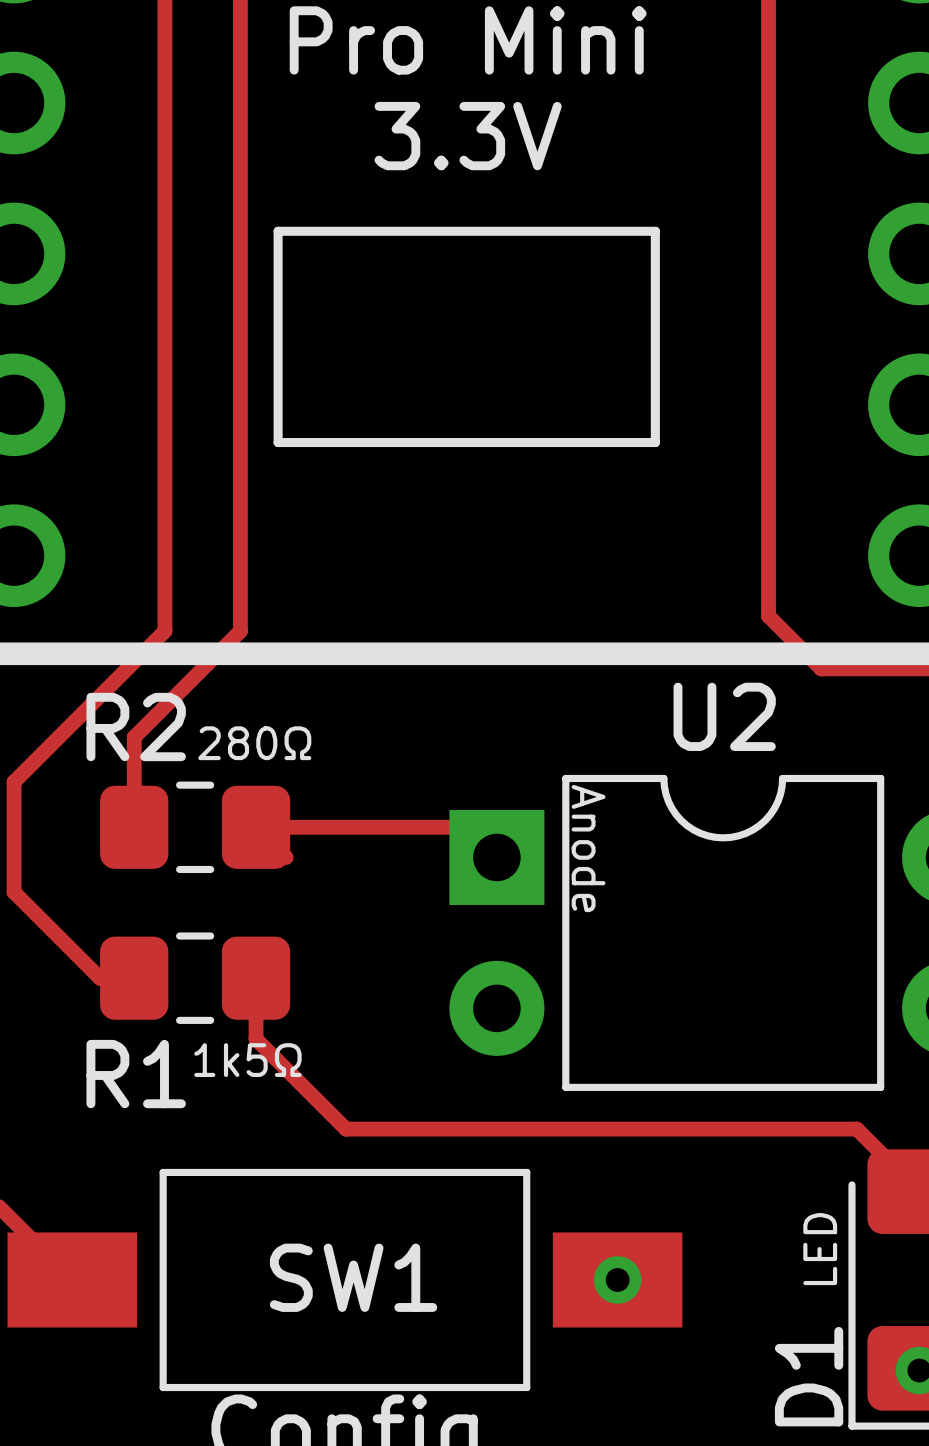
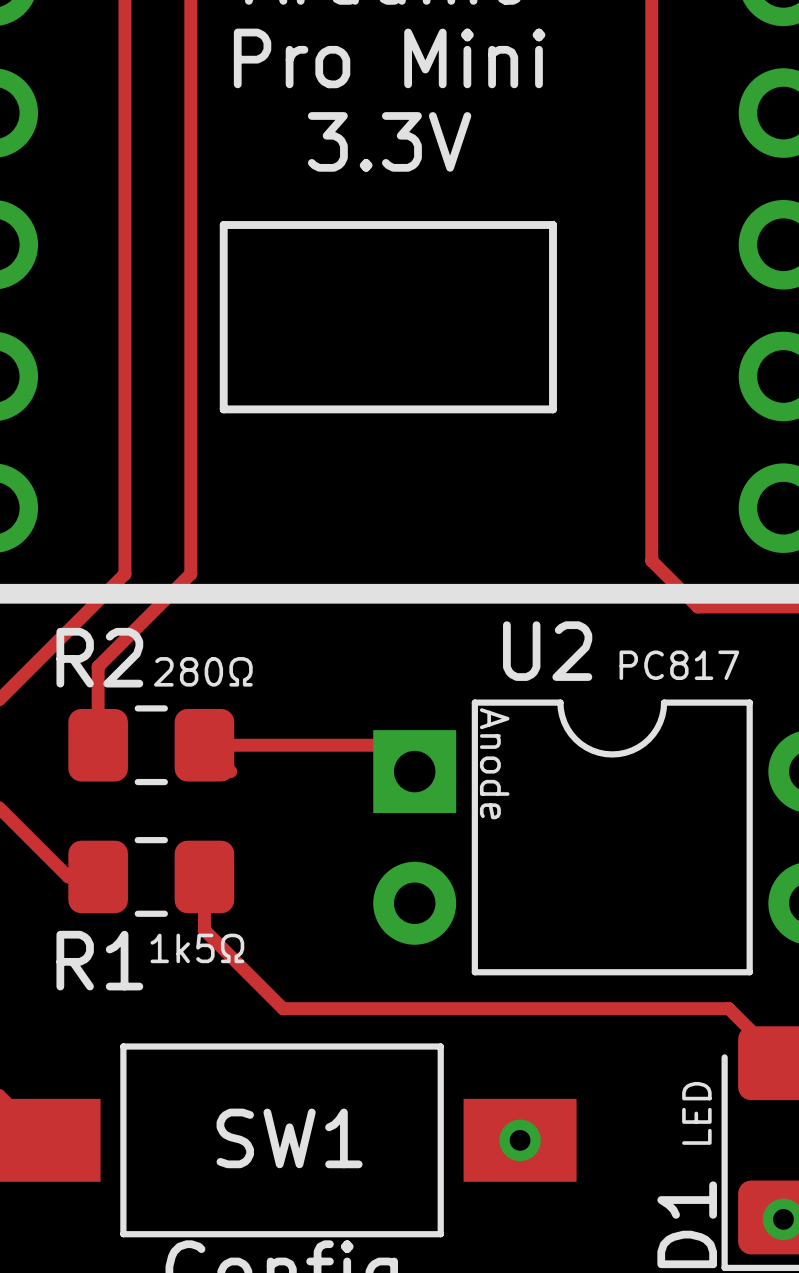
U2 name position: U2 (724, 716) -> U2 (547, 651)
text: none -> PC817 (679, 665)

